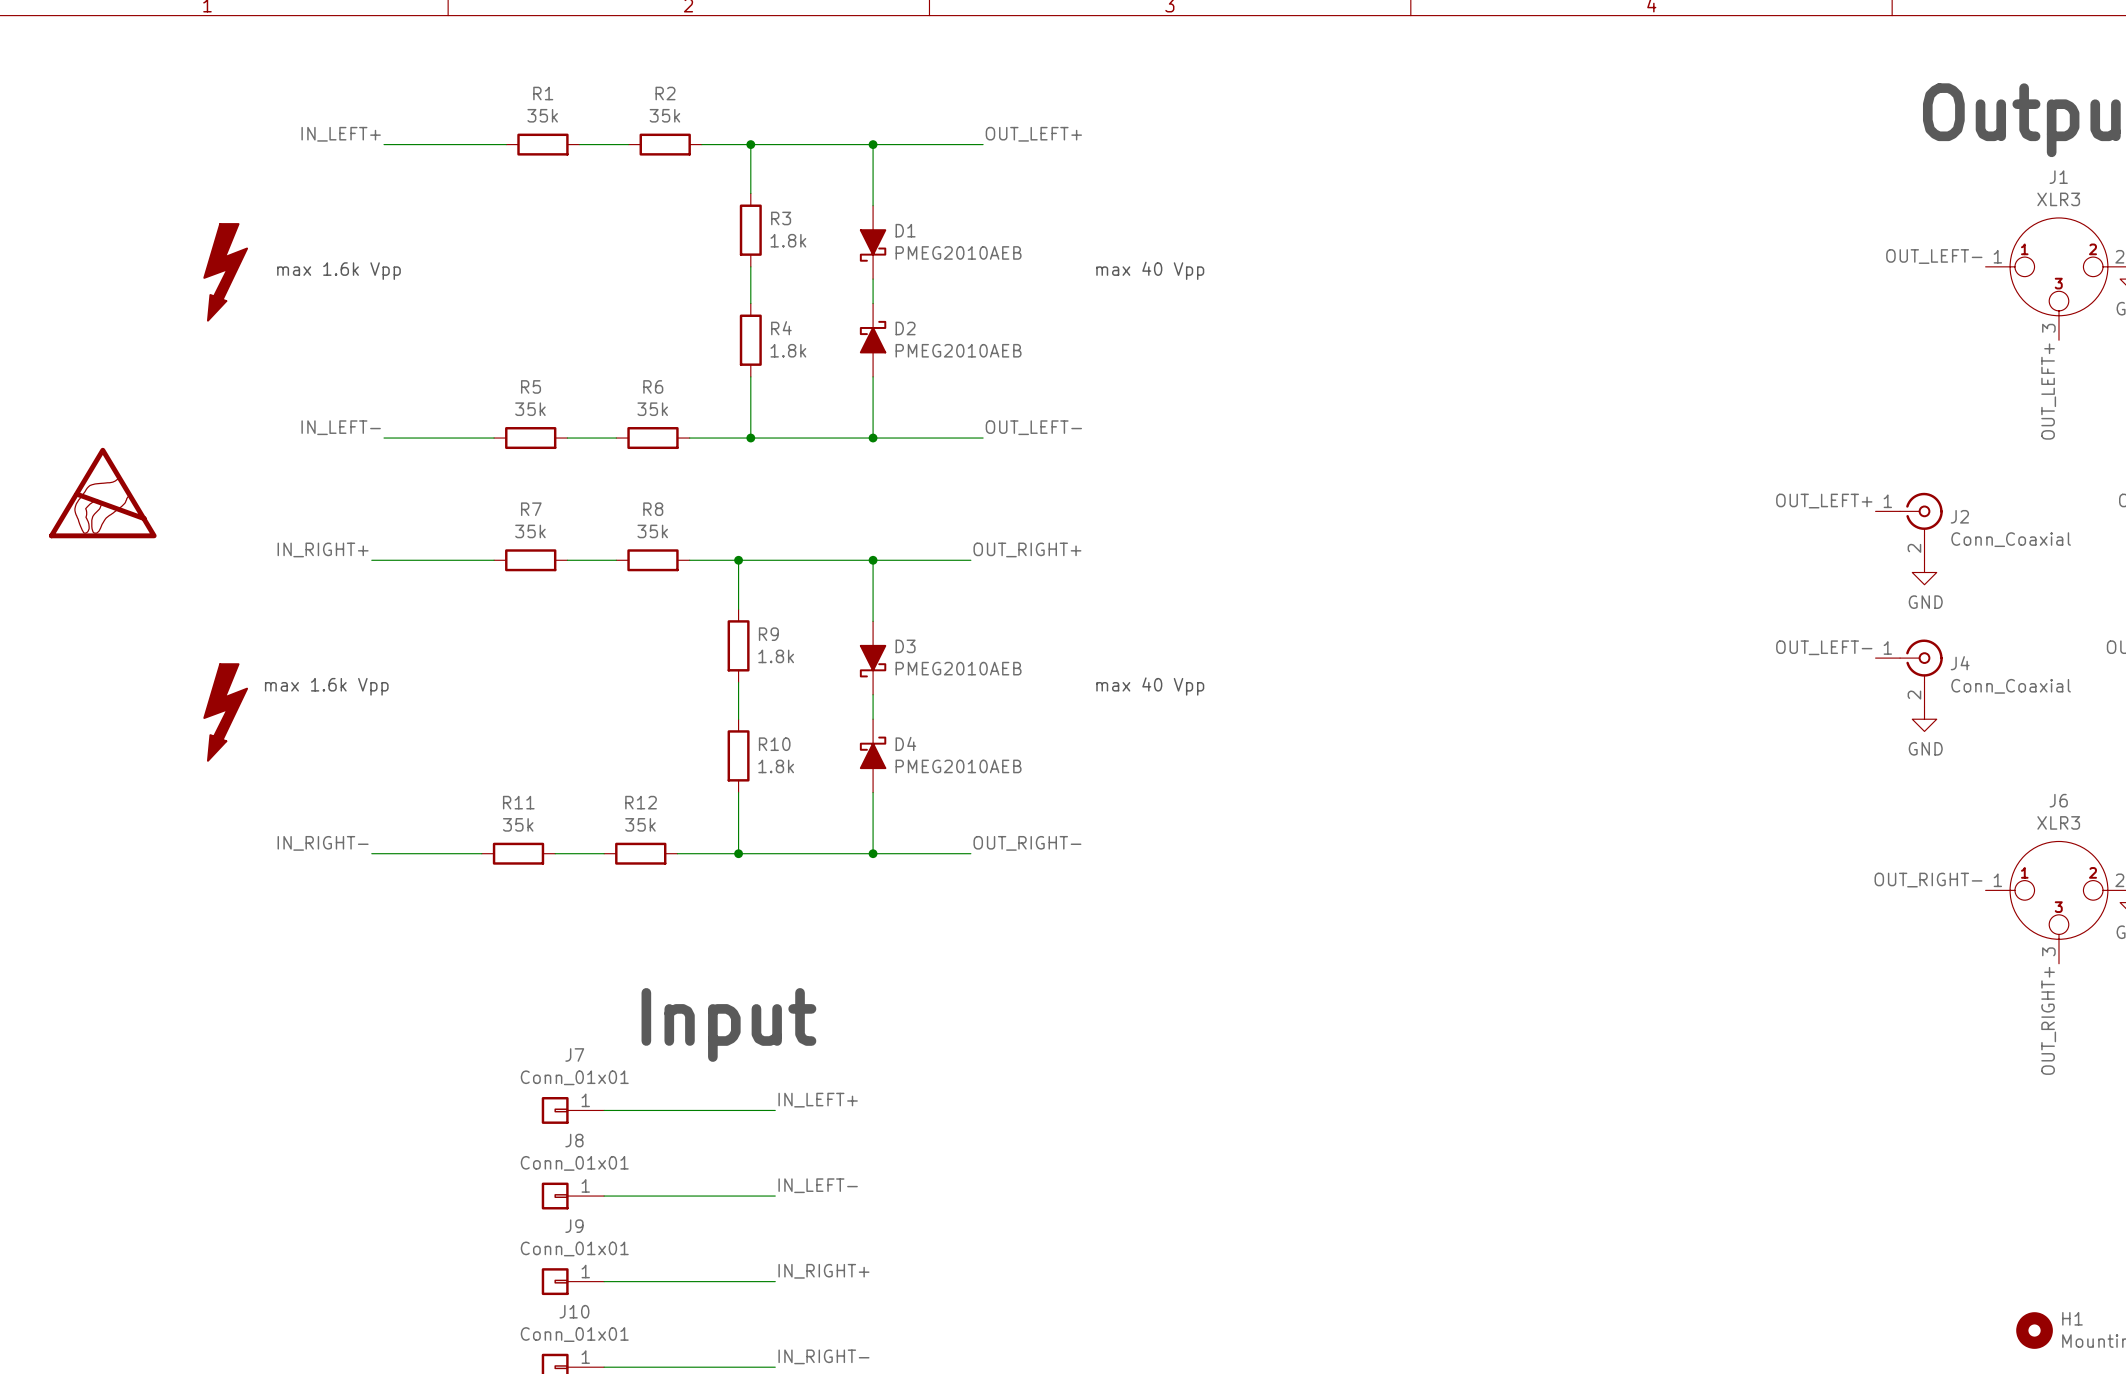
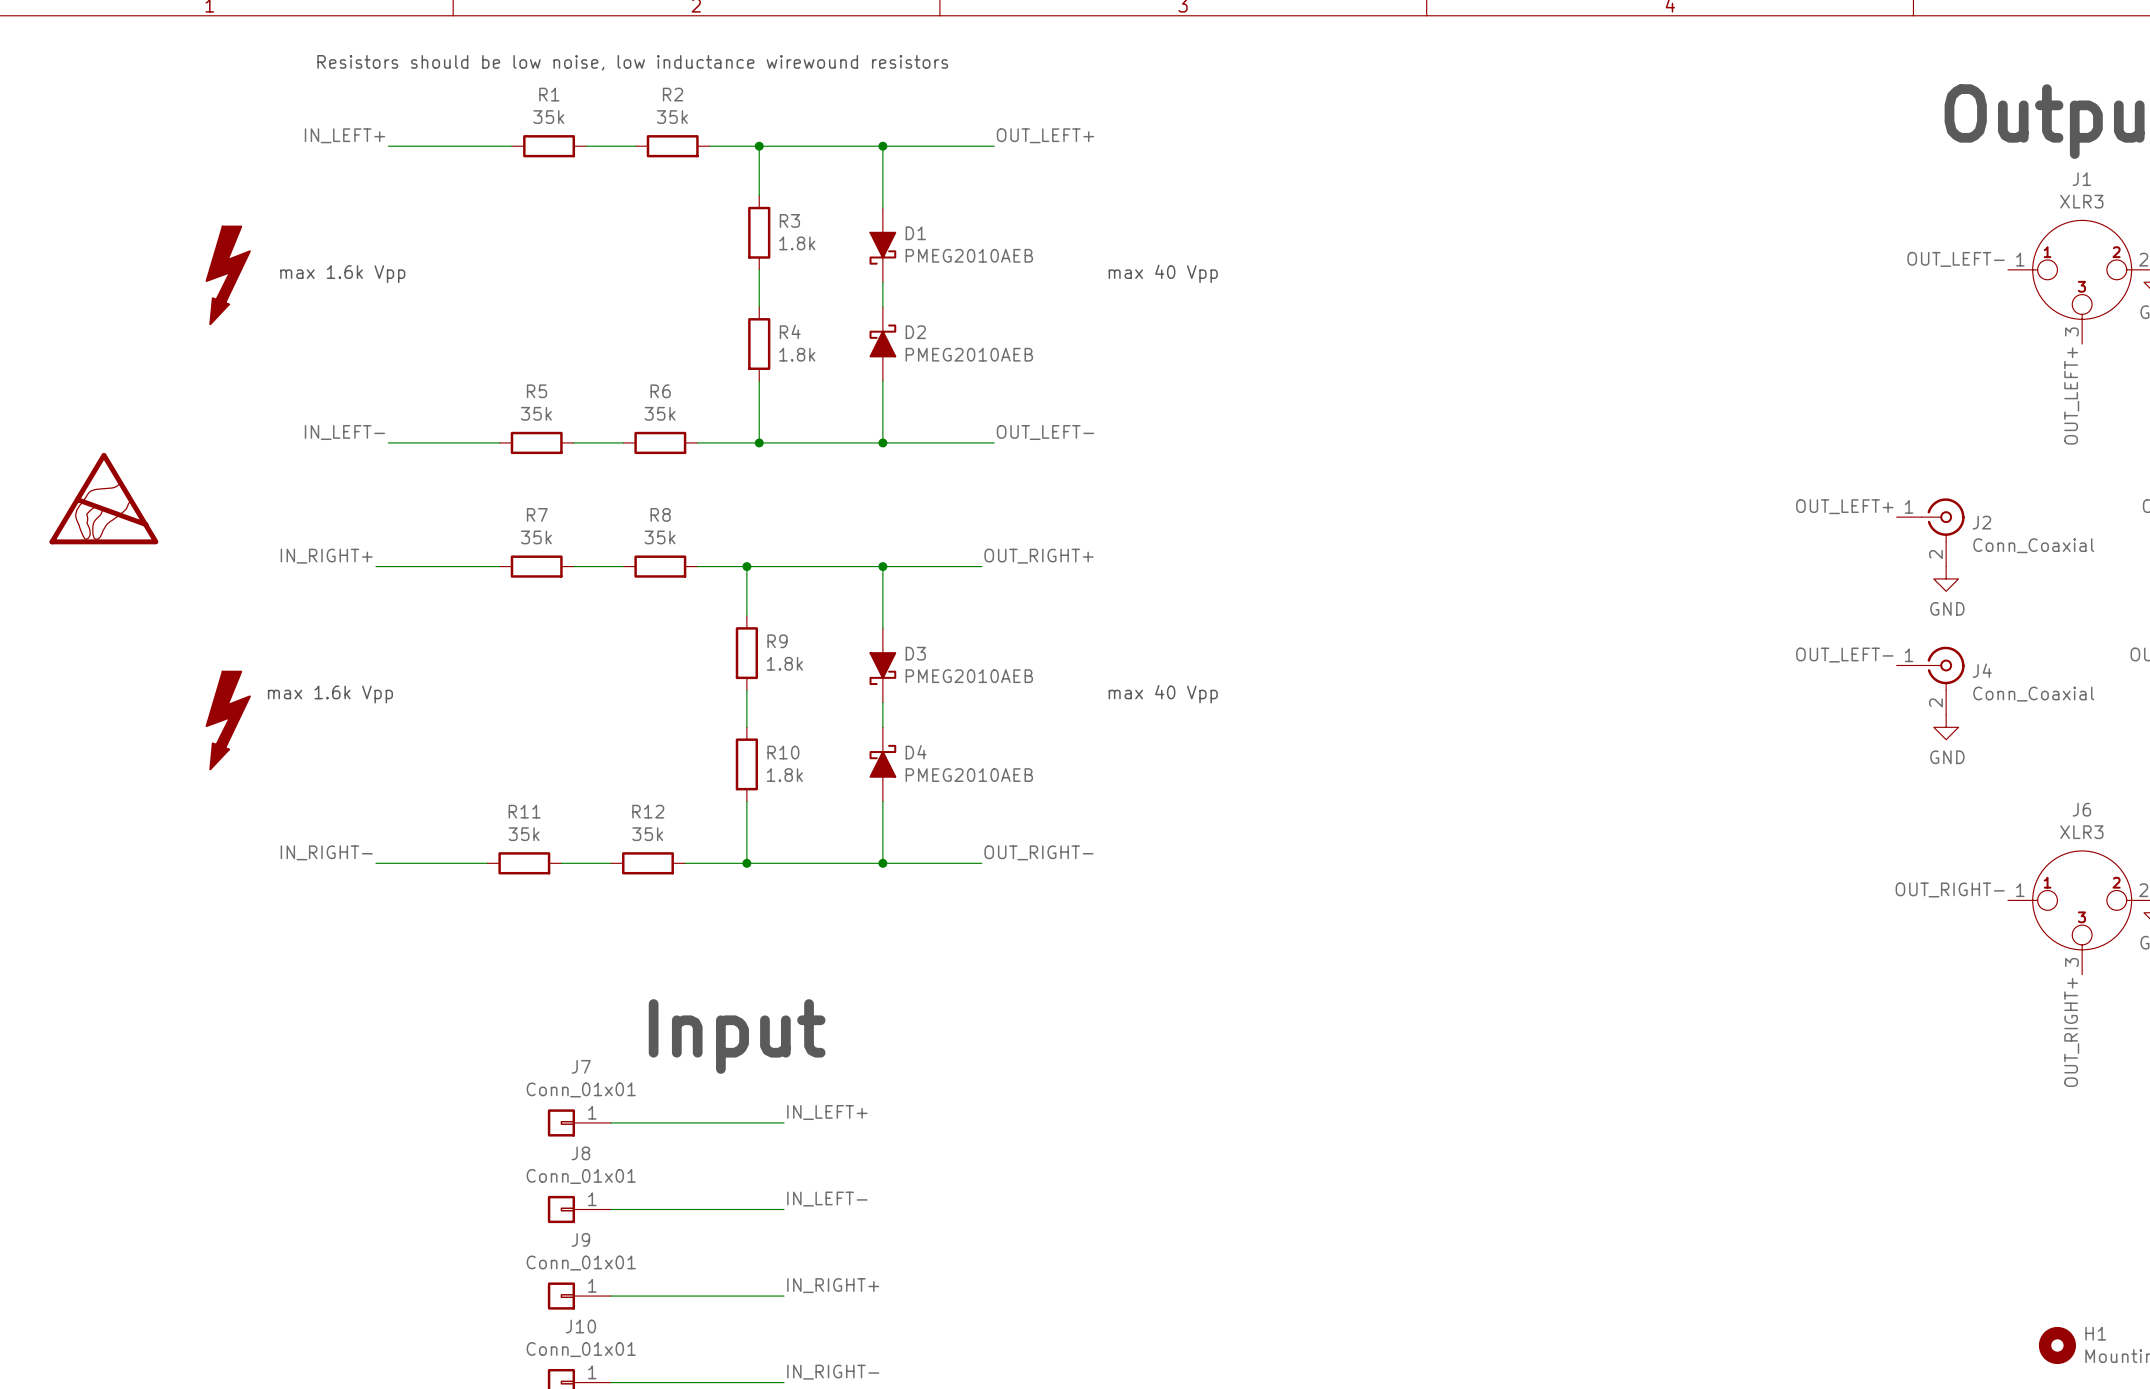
text: none -> Resistors should be low noise, low inductance wirewound resistors (632, 62)

